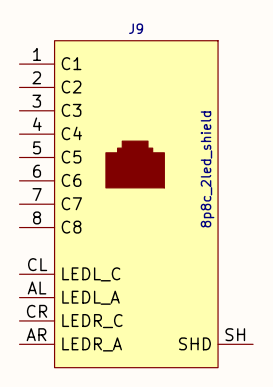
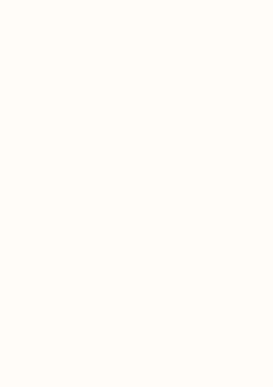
J9: 8p8c_2led_shield (136, 204) -> none

